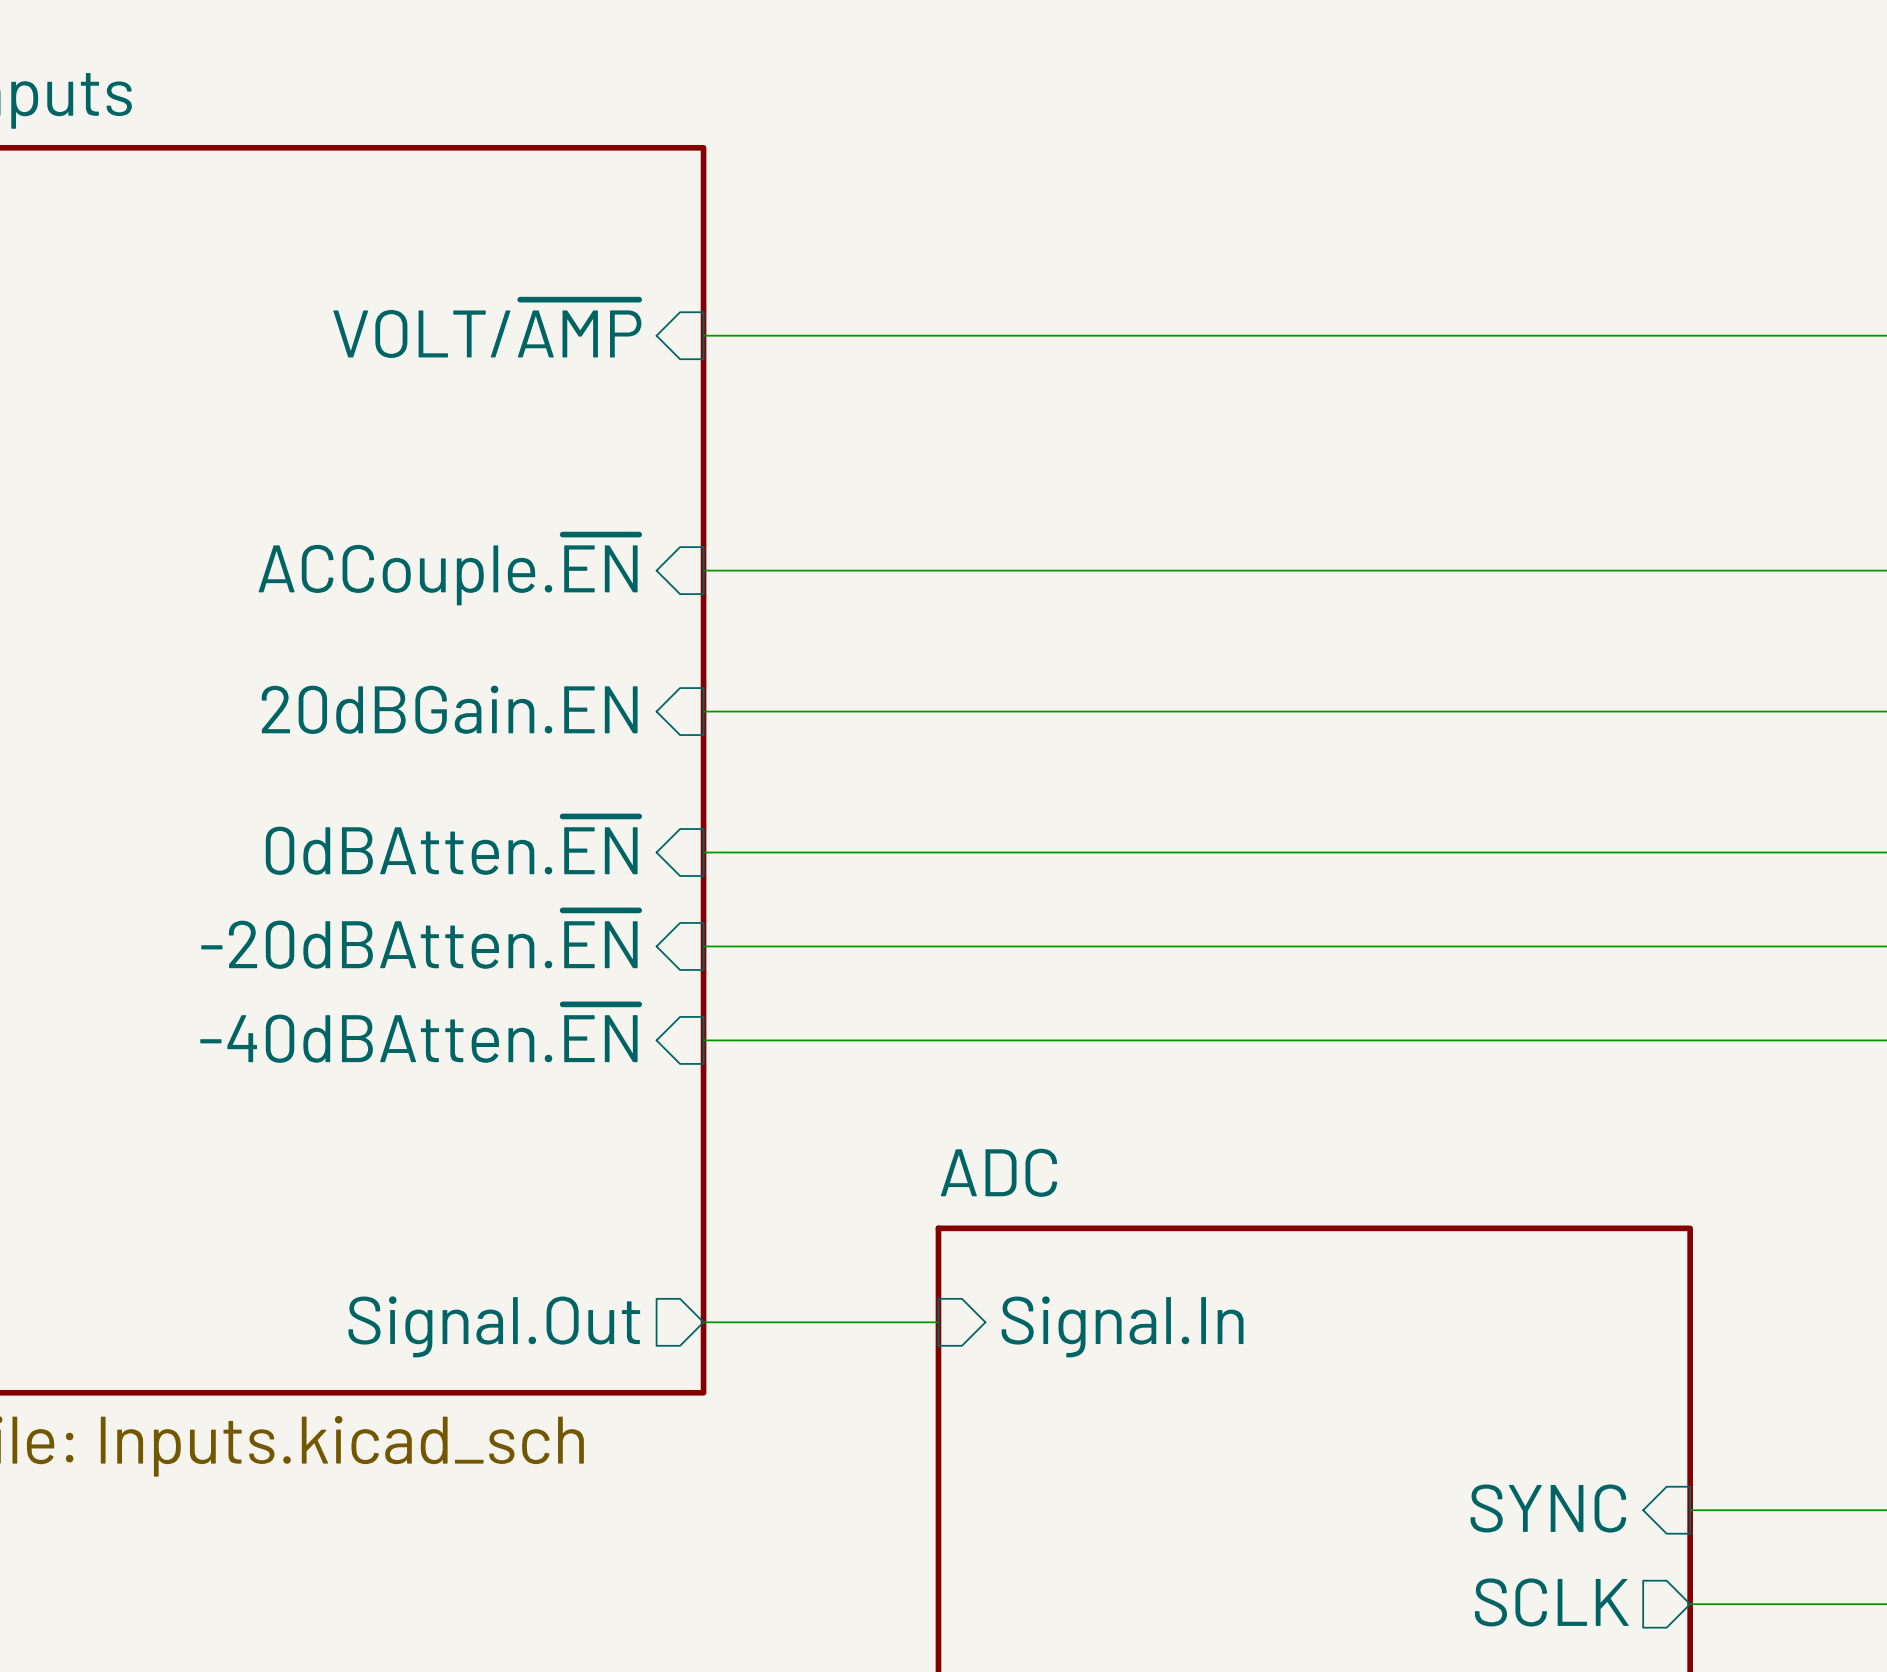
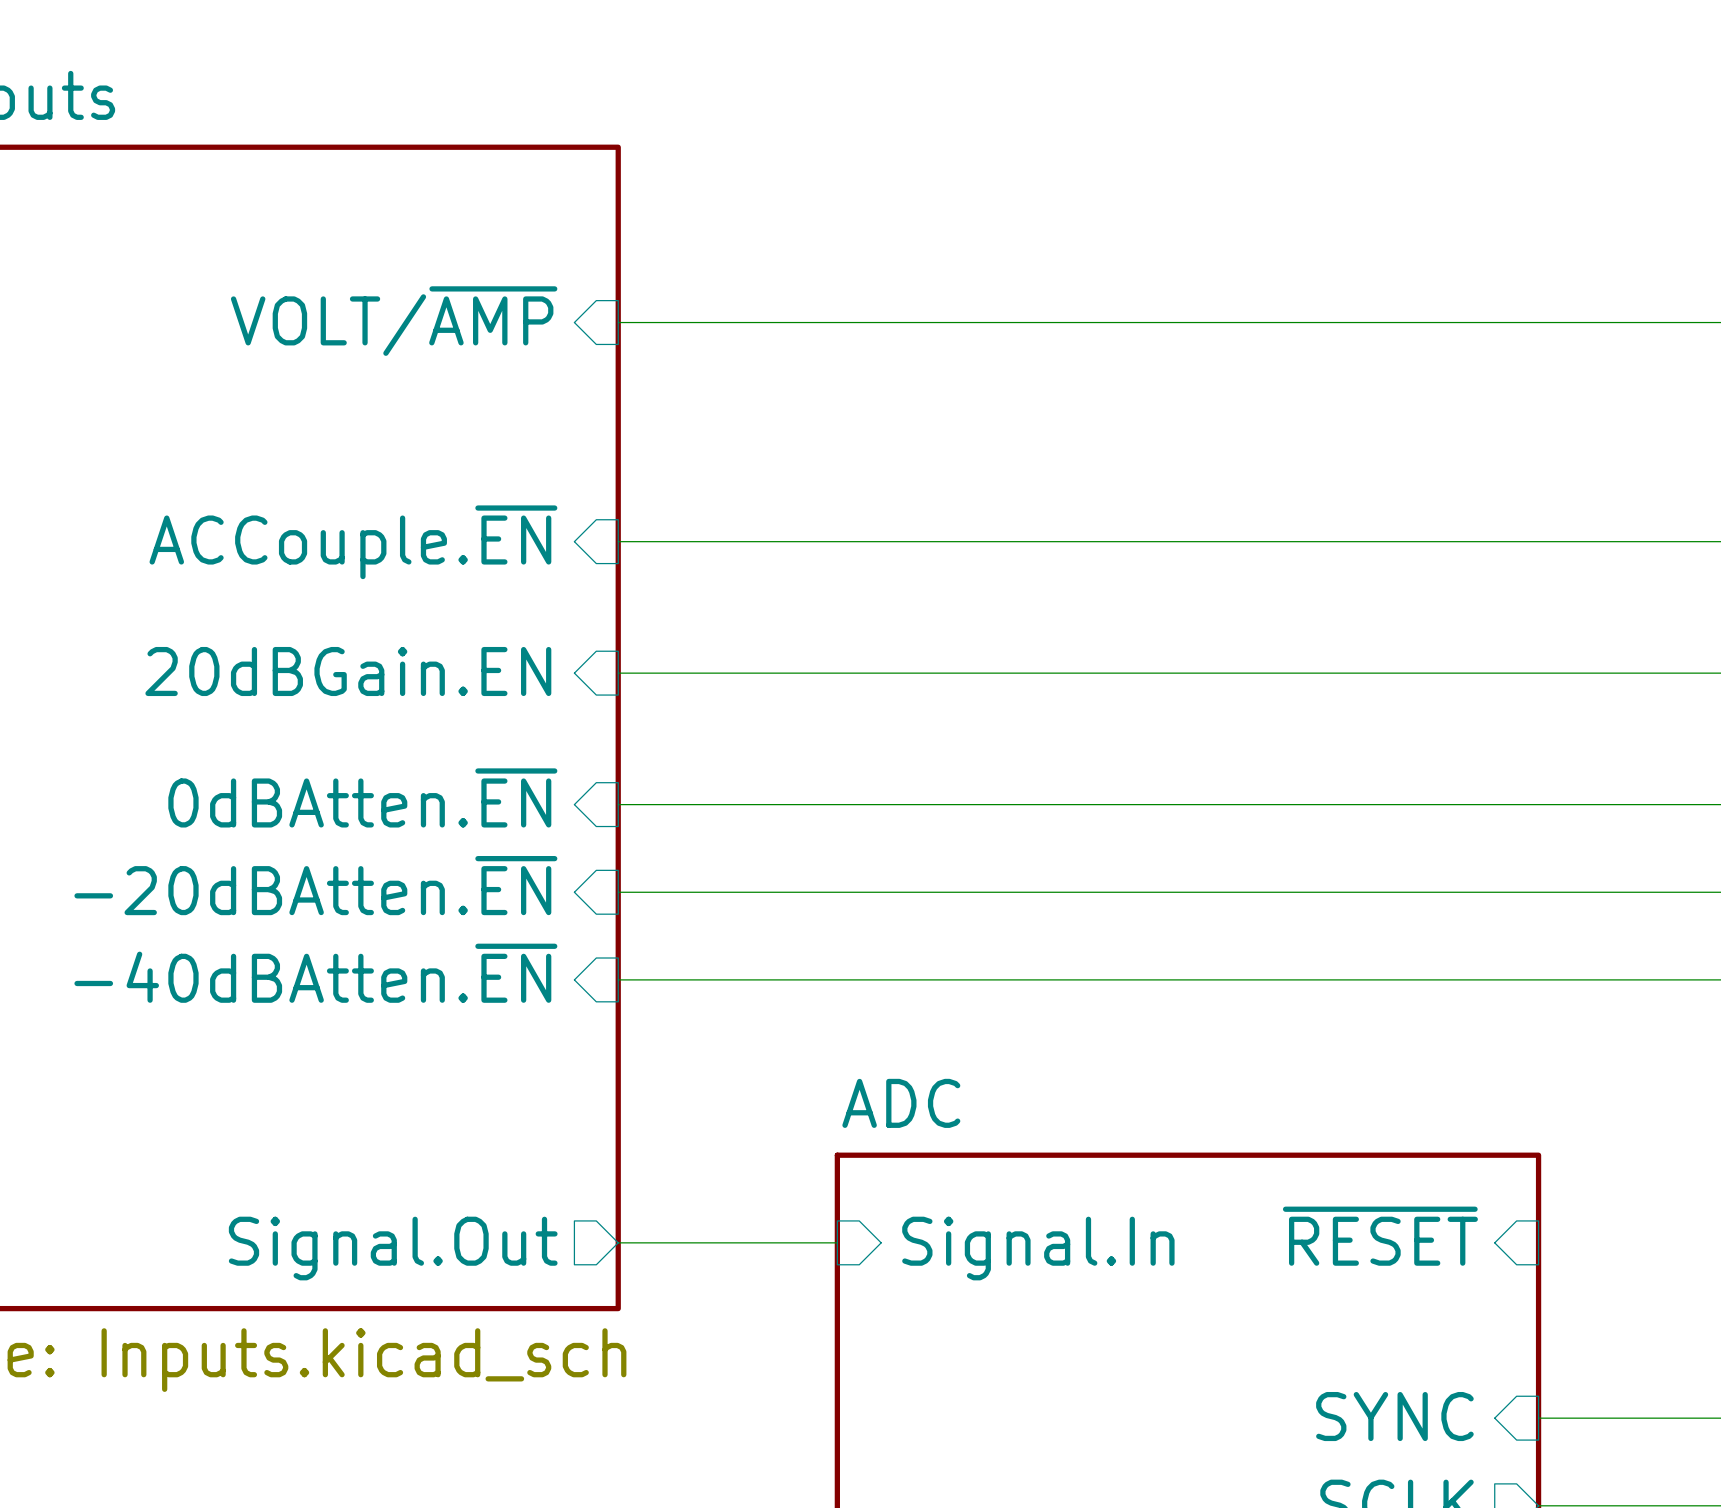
sheet pin: none -> ~{RESET} (1380, 1236)

